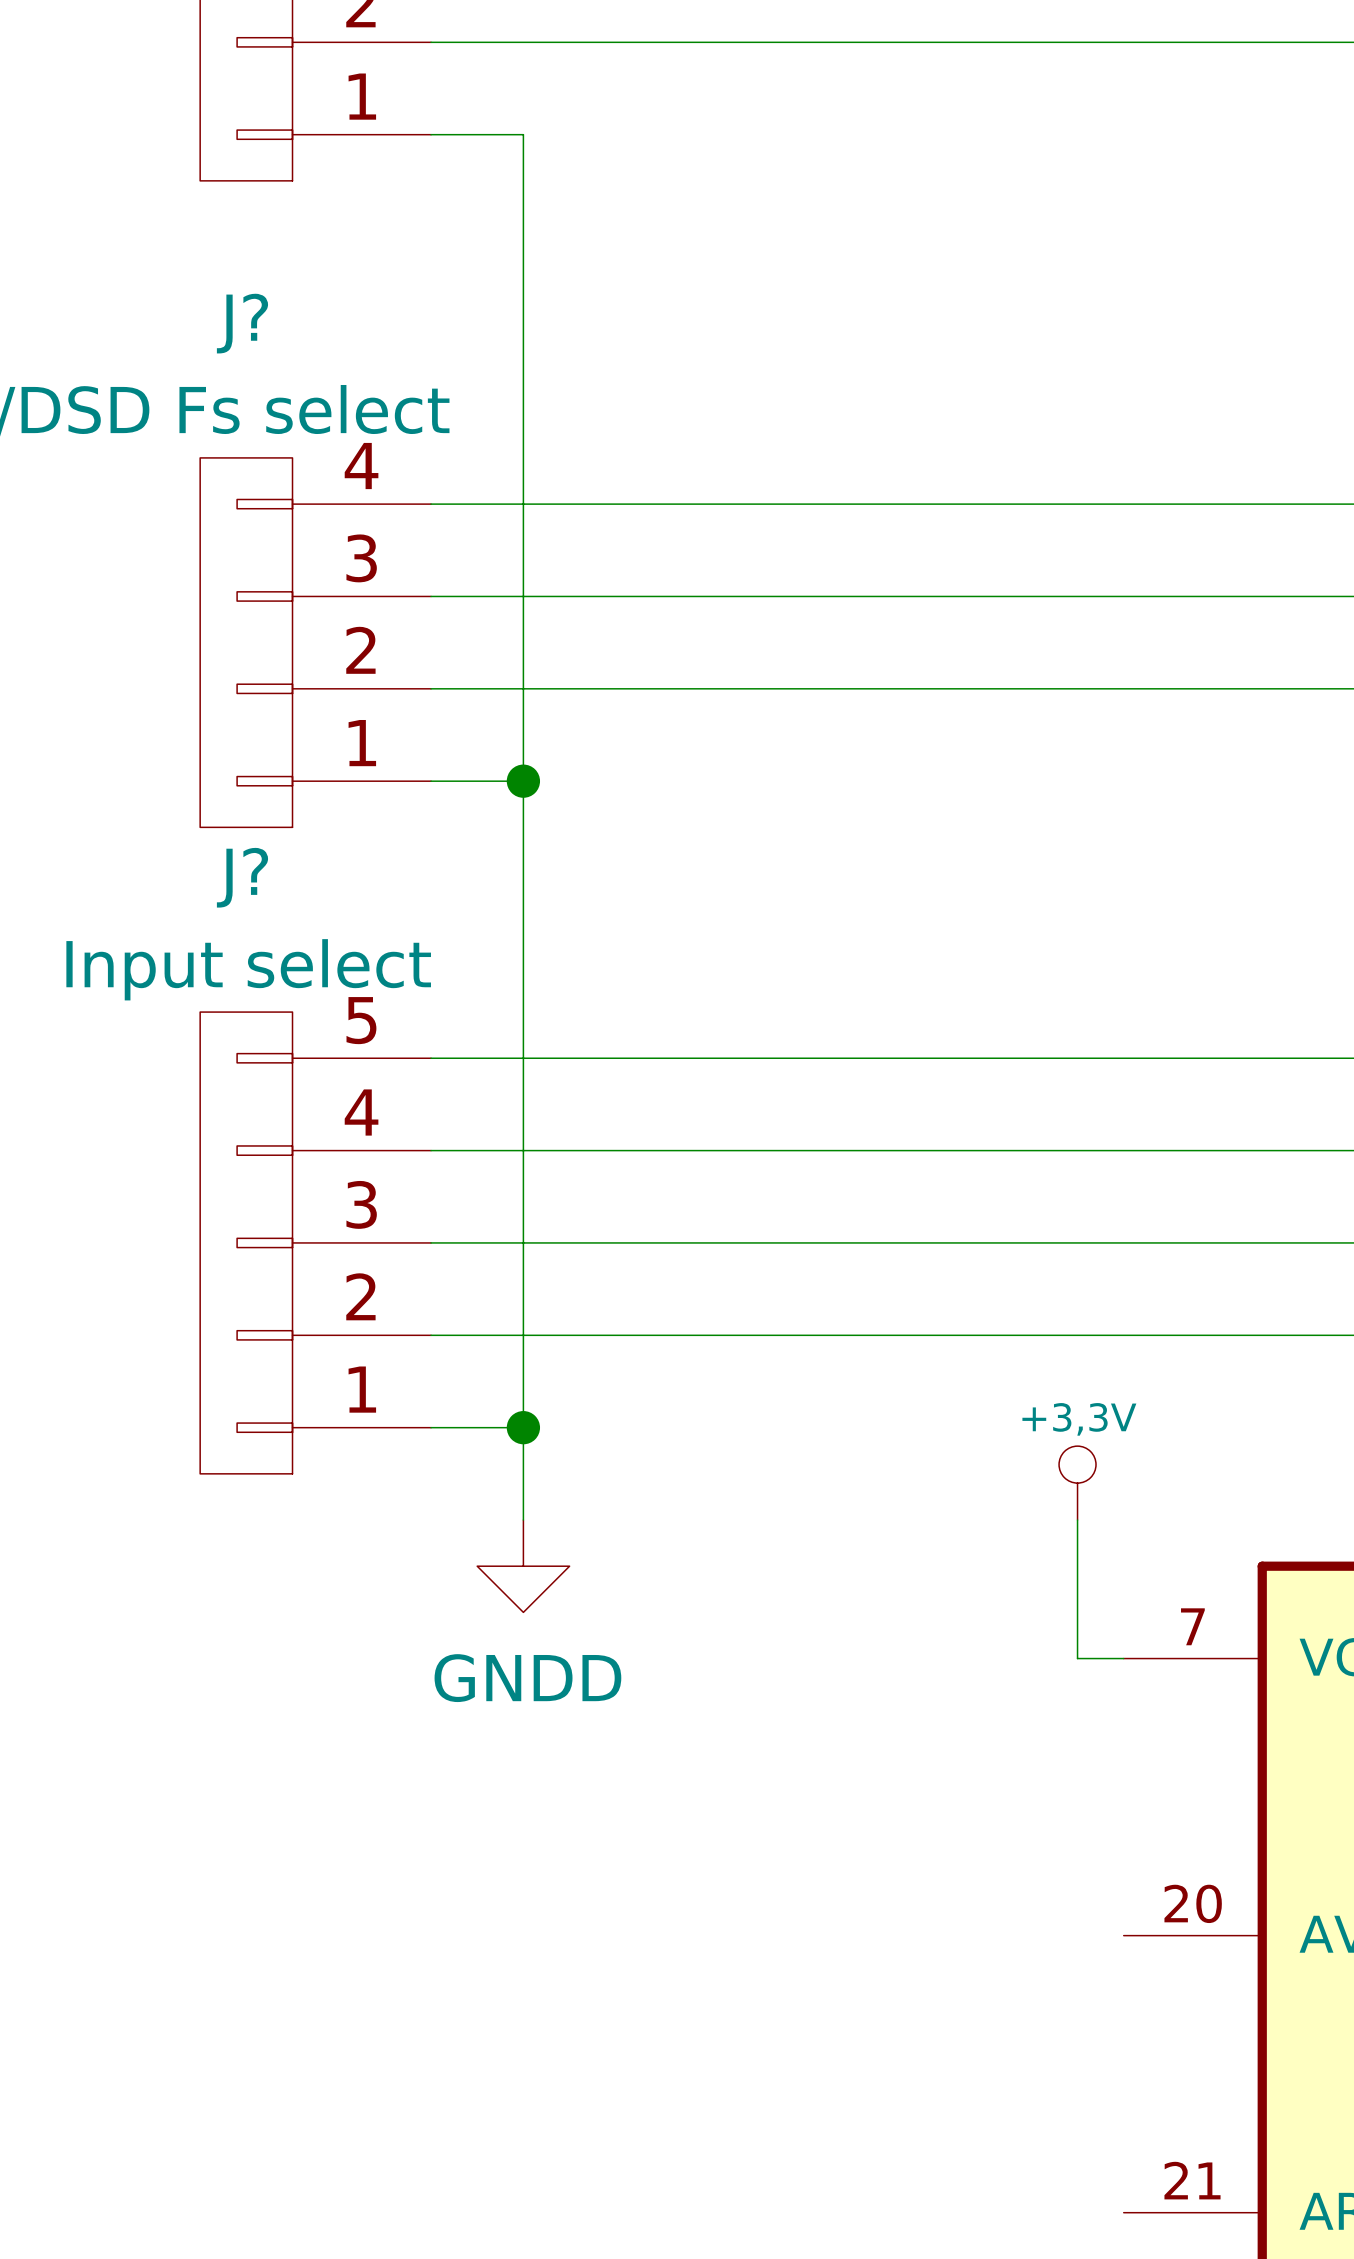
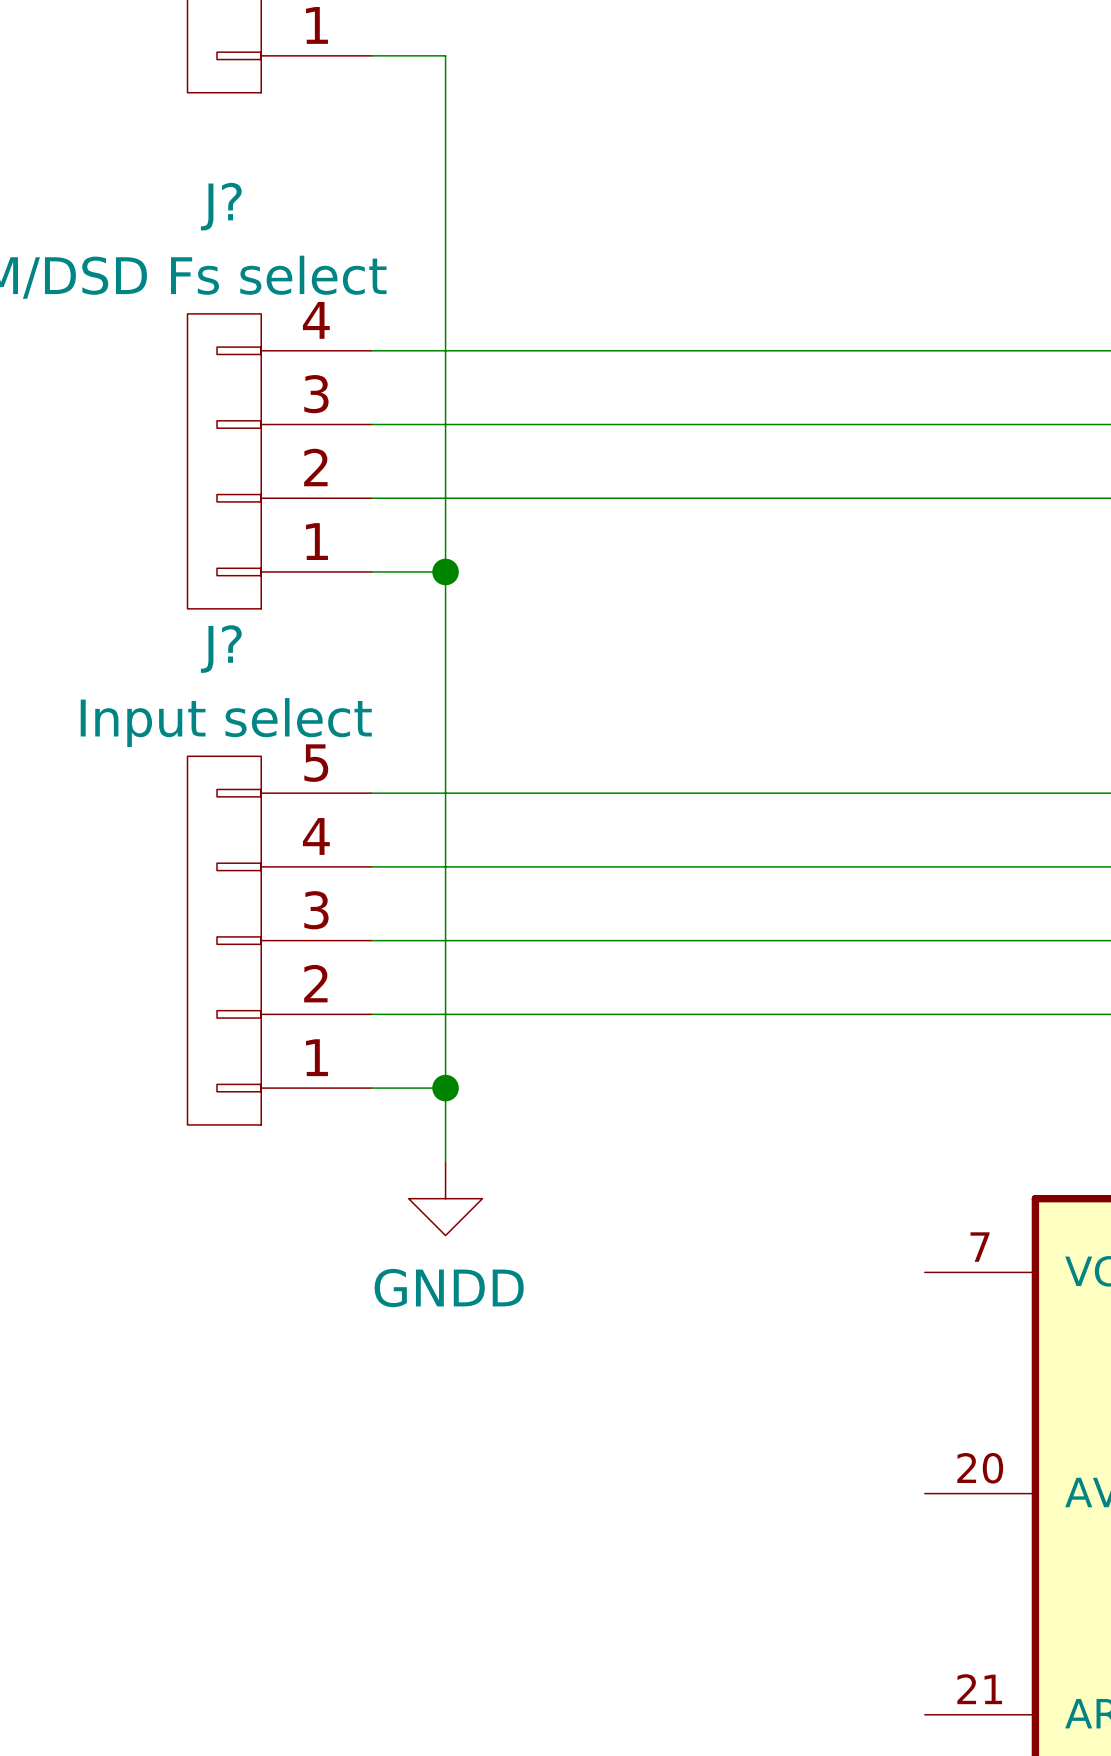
power symbol: +3,3V (1077, 1483) -> none
wire: (1077, 1520) (1077, 1658) (1123, 1658) -> none

